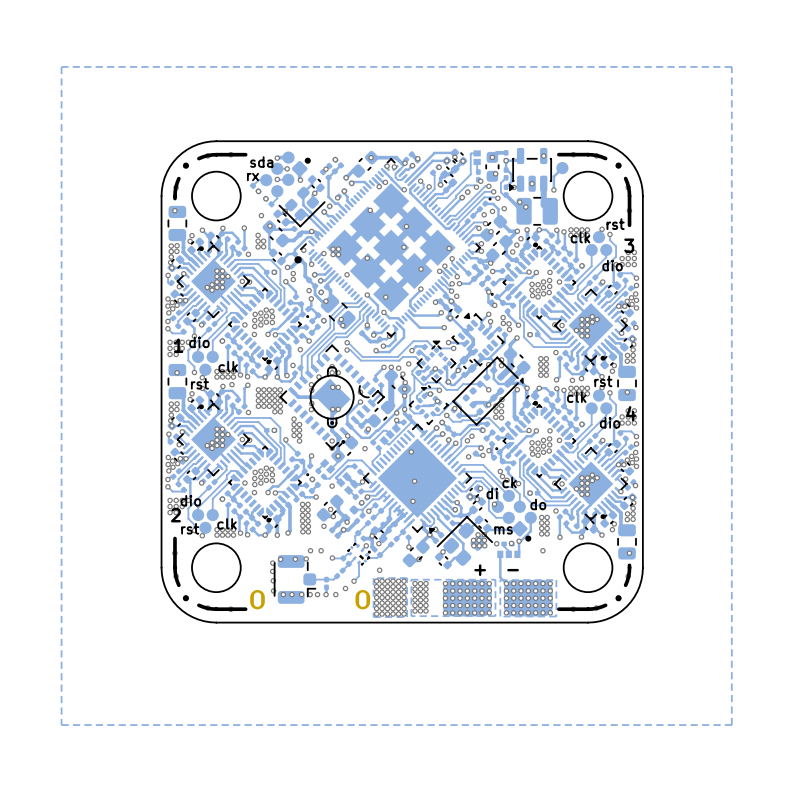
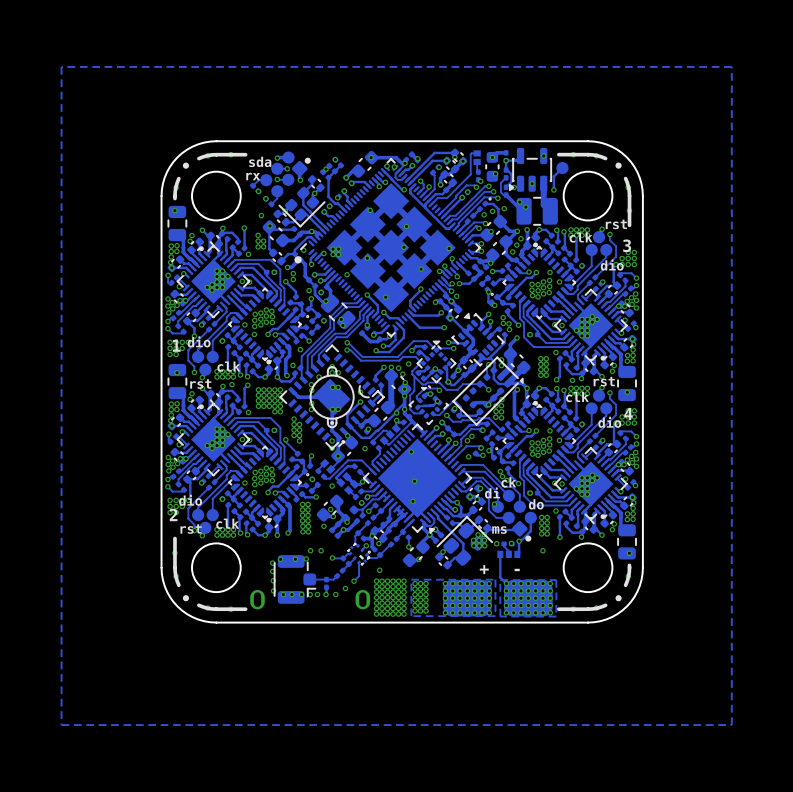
zone outline: (407, 578) (407, 617) (373, 617) (373, 578) (407, 578) -> none

